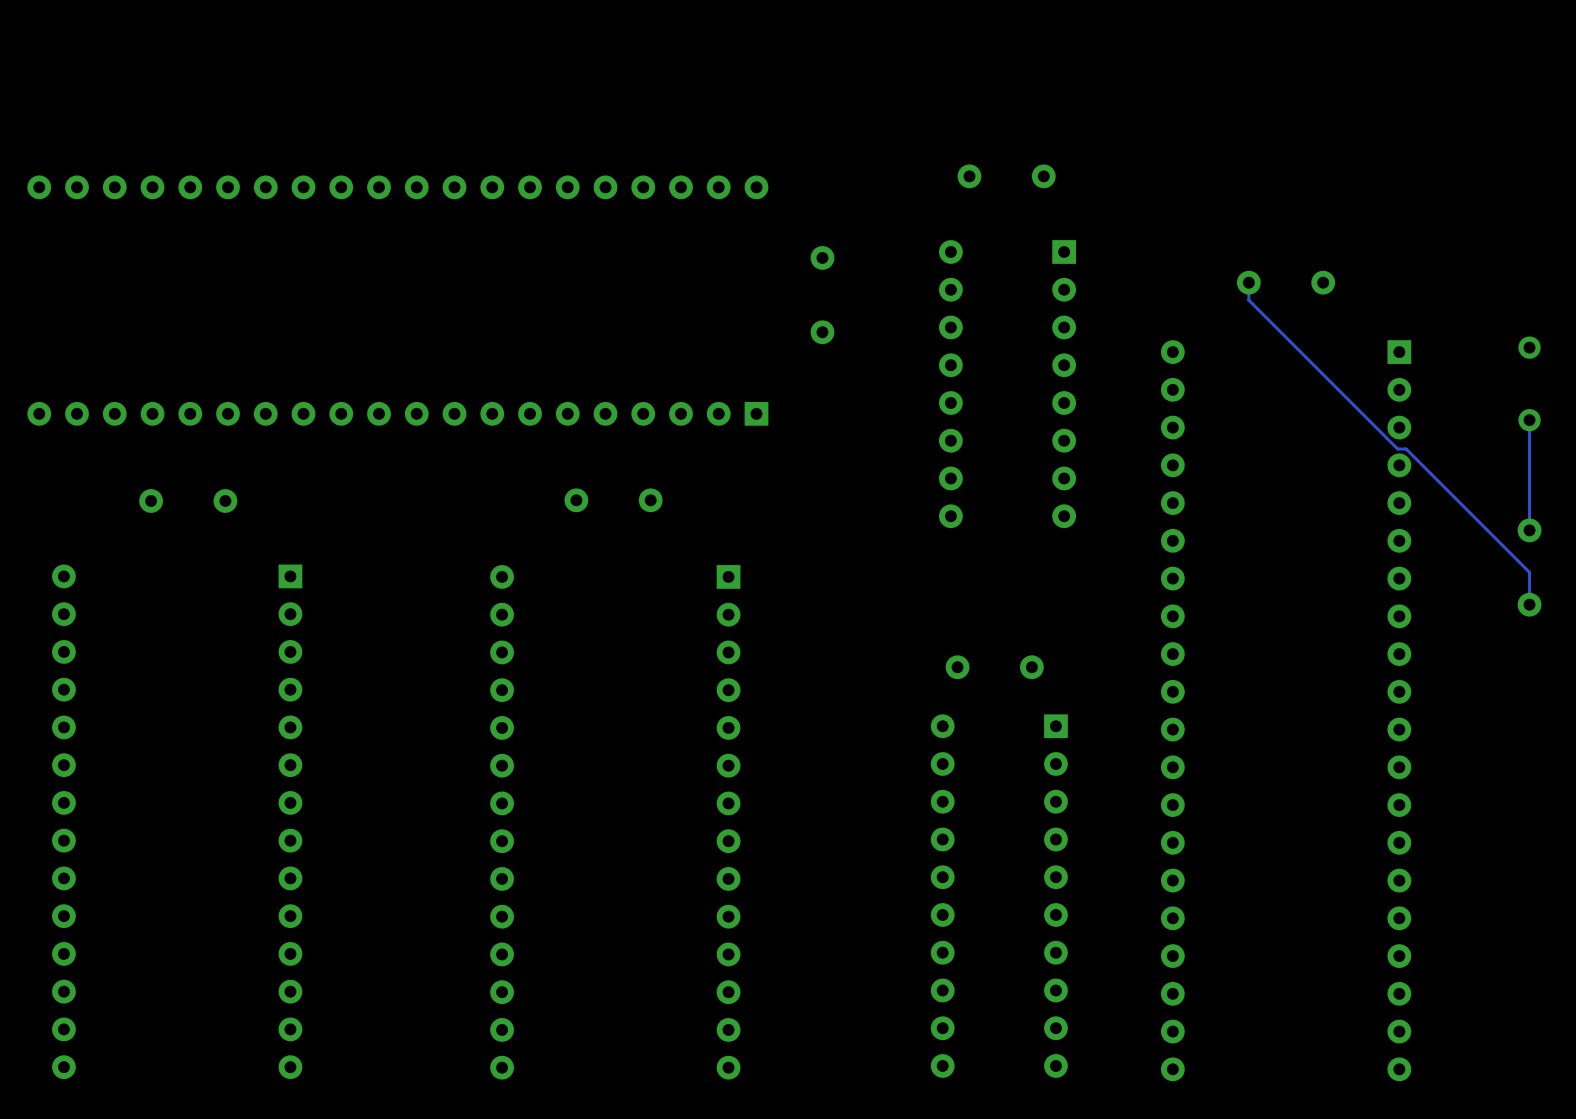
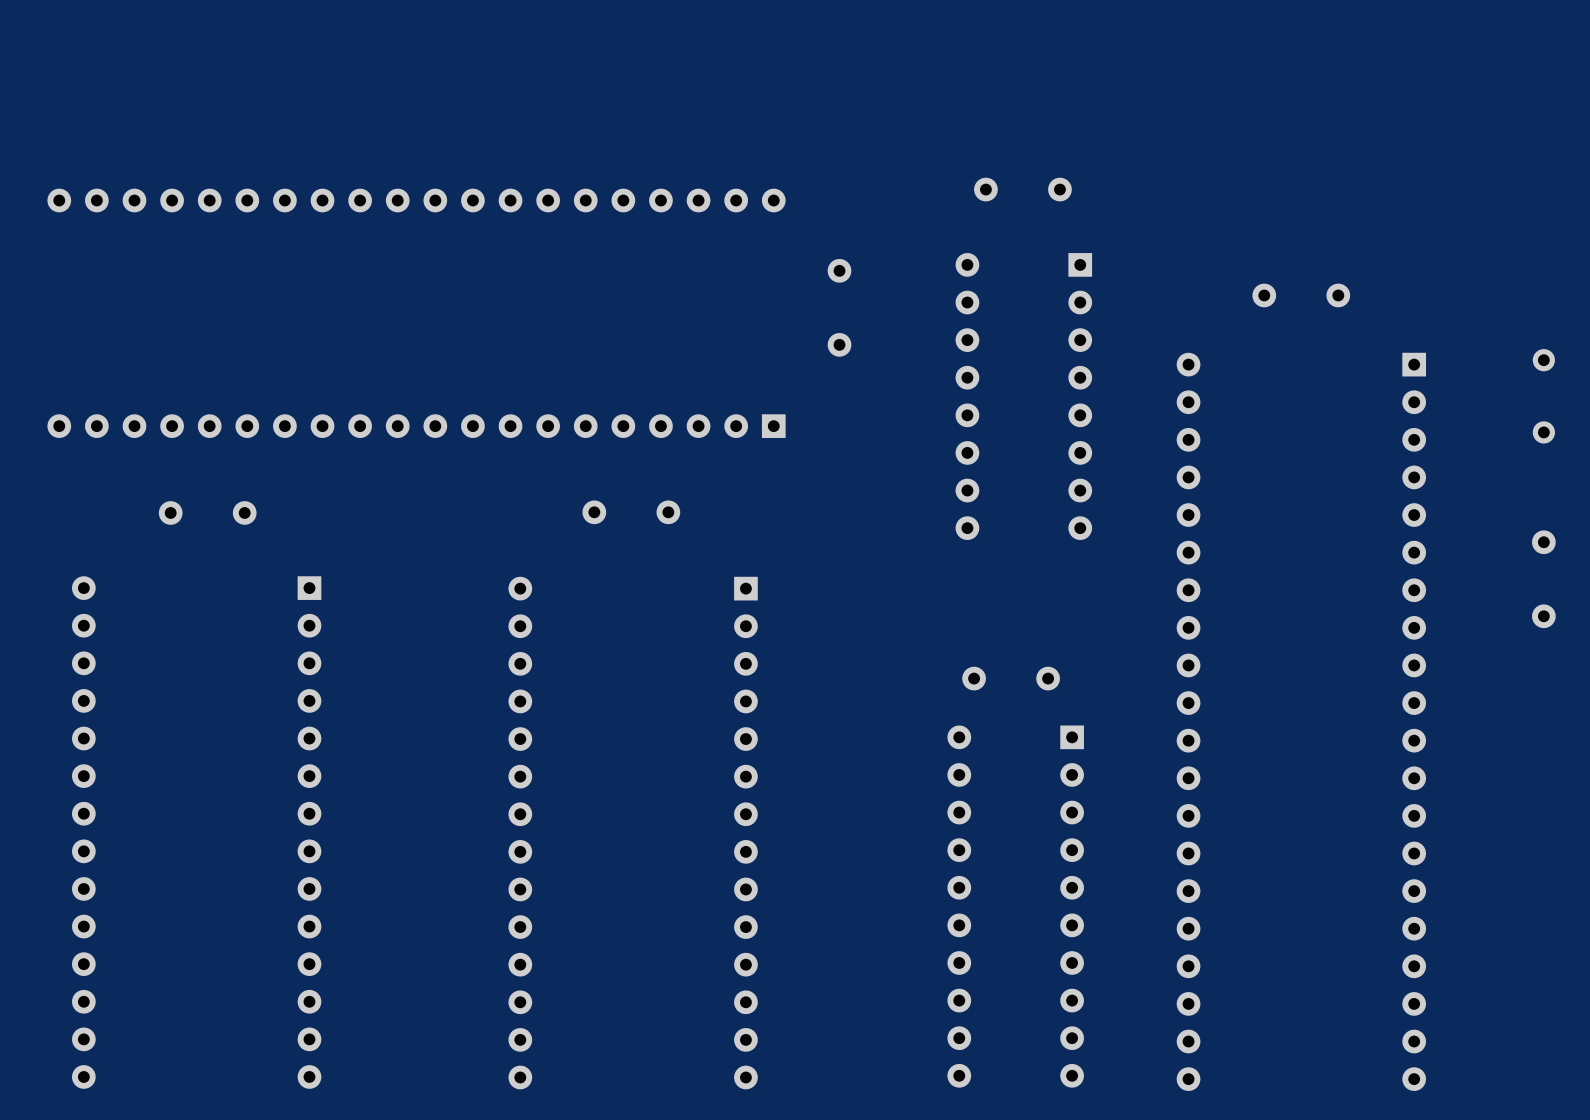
track: (1248, 282) (1248, 300) (1397, 448) (1406, 448) (1529, 572) (1529, 604) -> none
track: (1529, 420) (1529, 530) -> none

